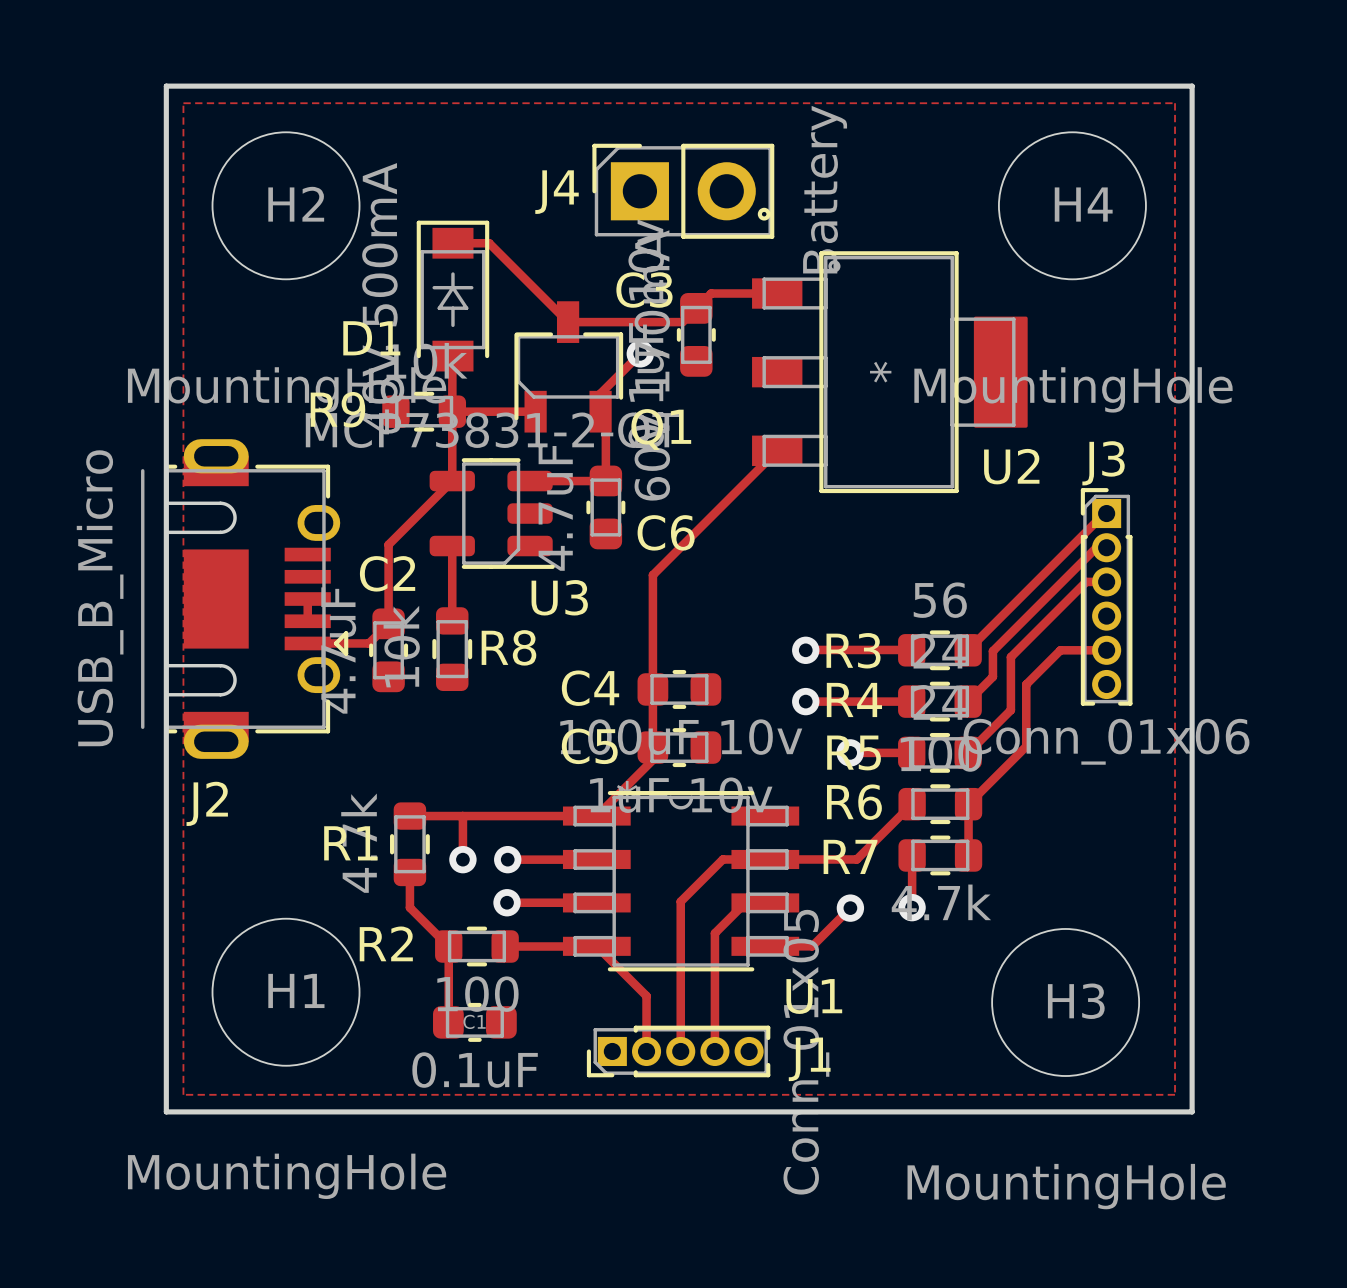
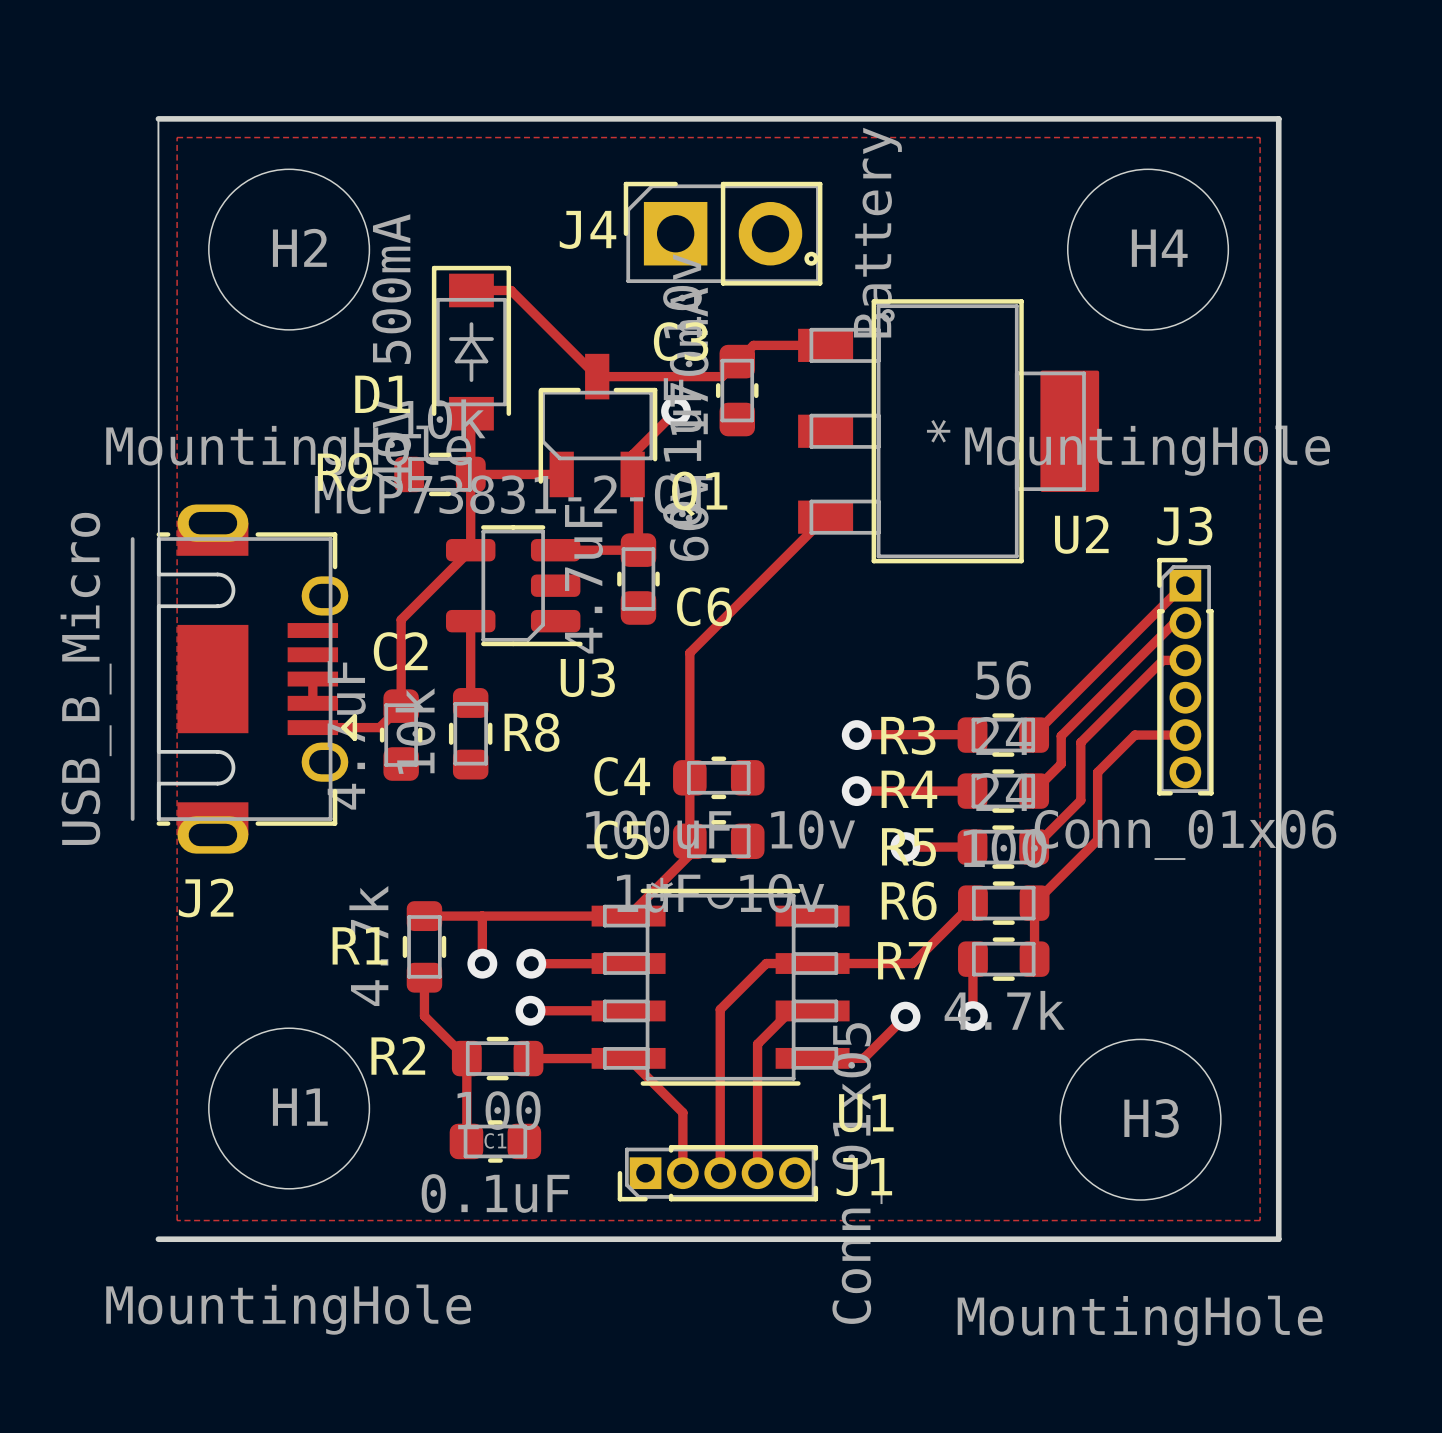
board edge: (166, 86) (166, 1111) -> (158, 118) (158, 539)

